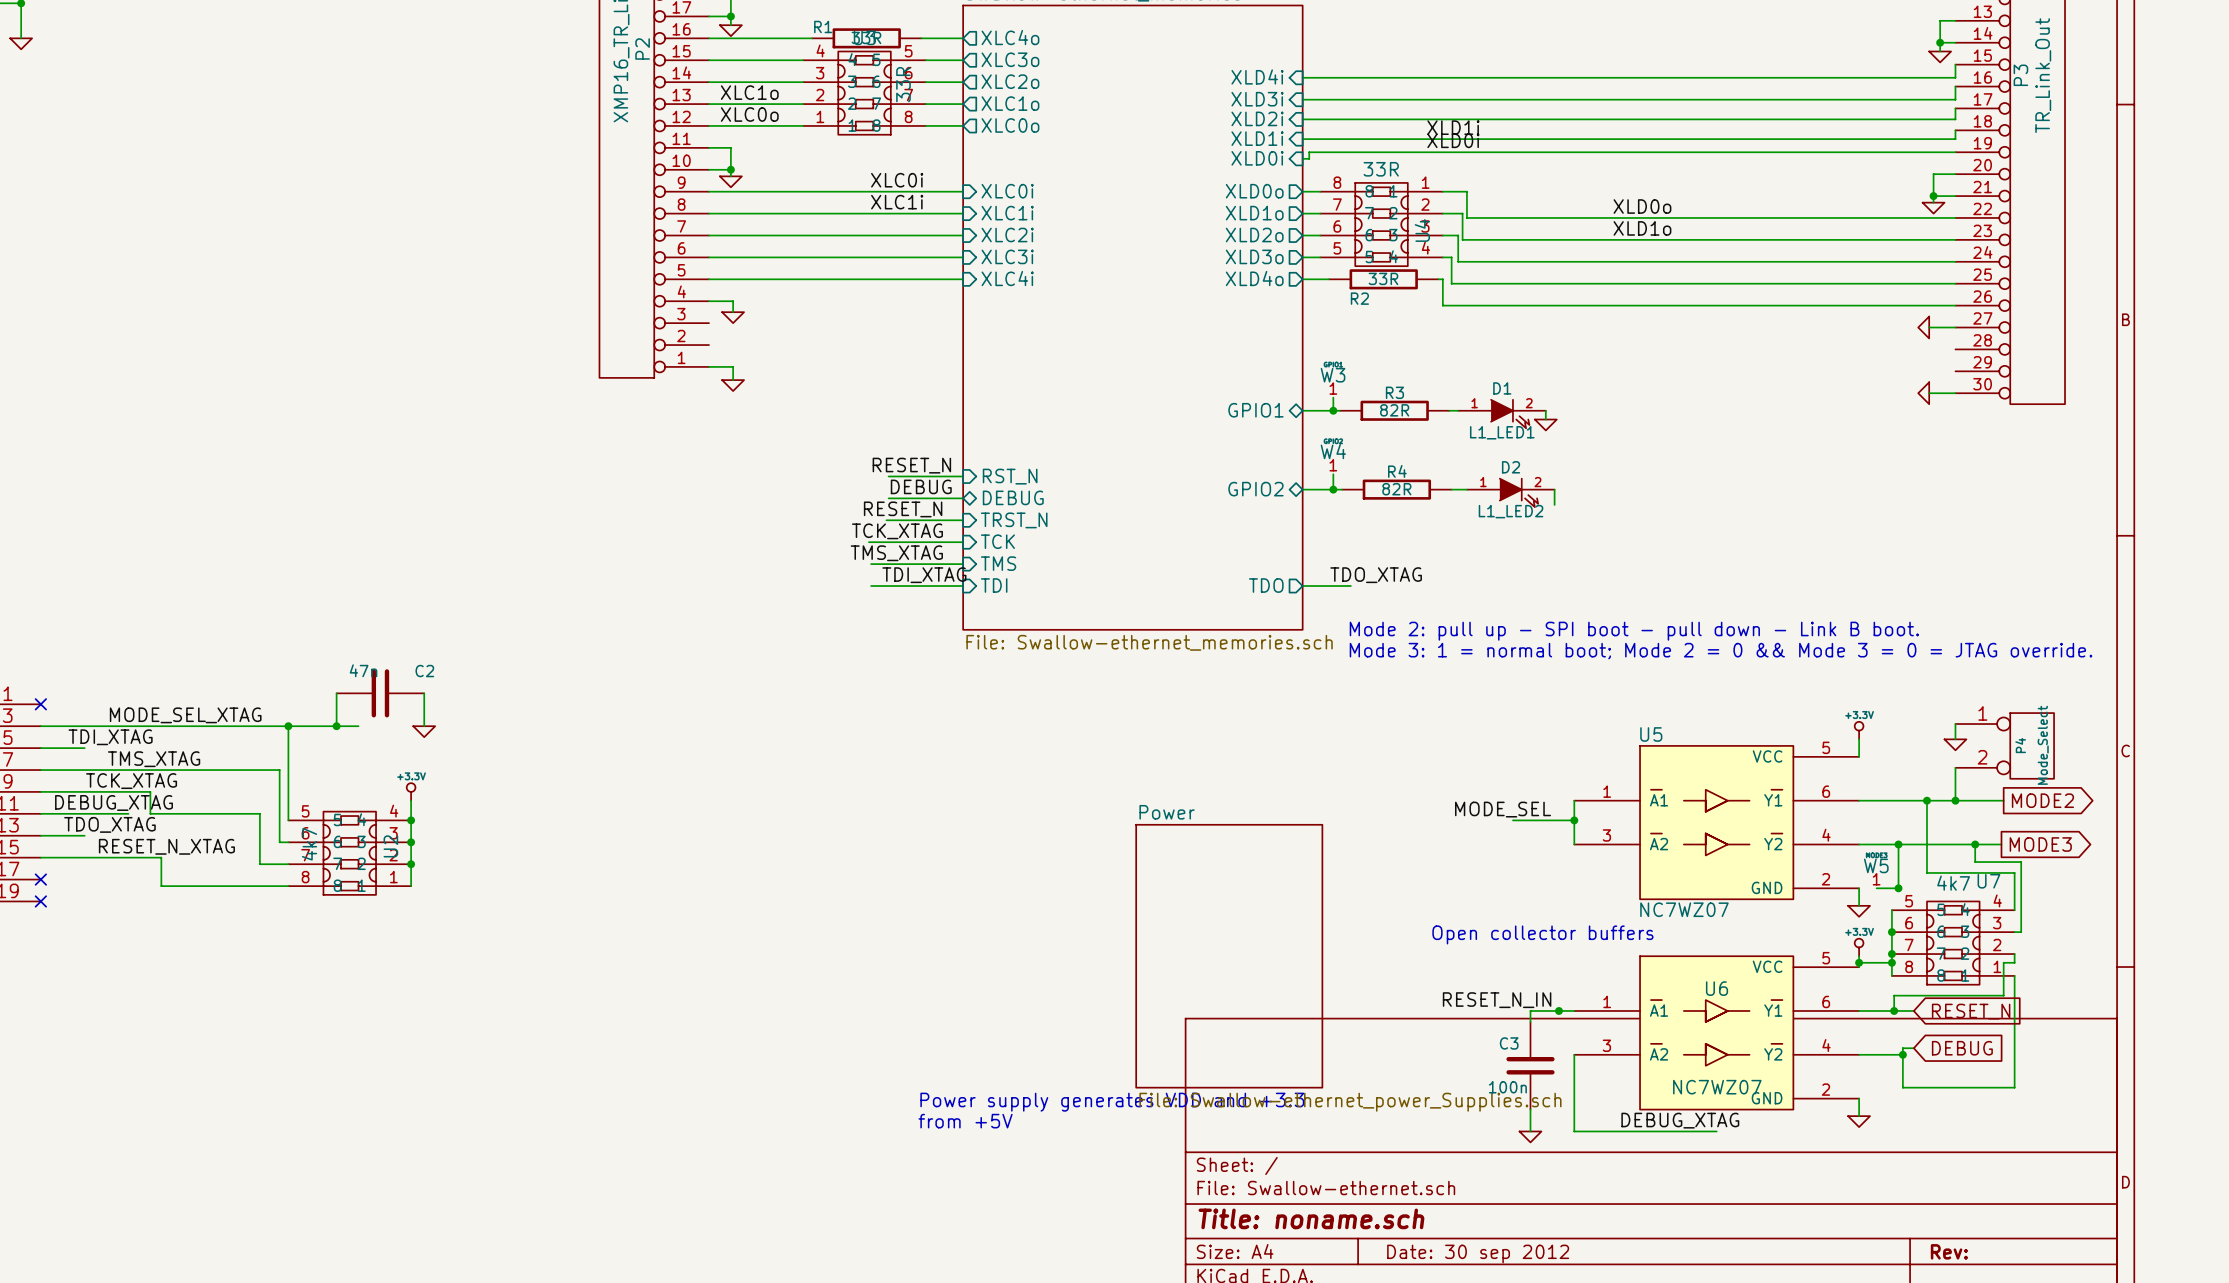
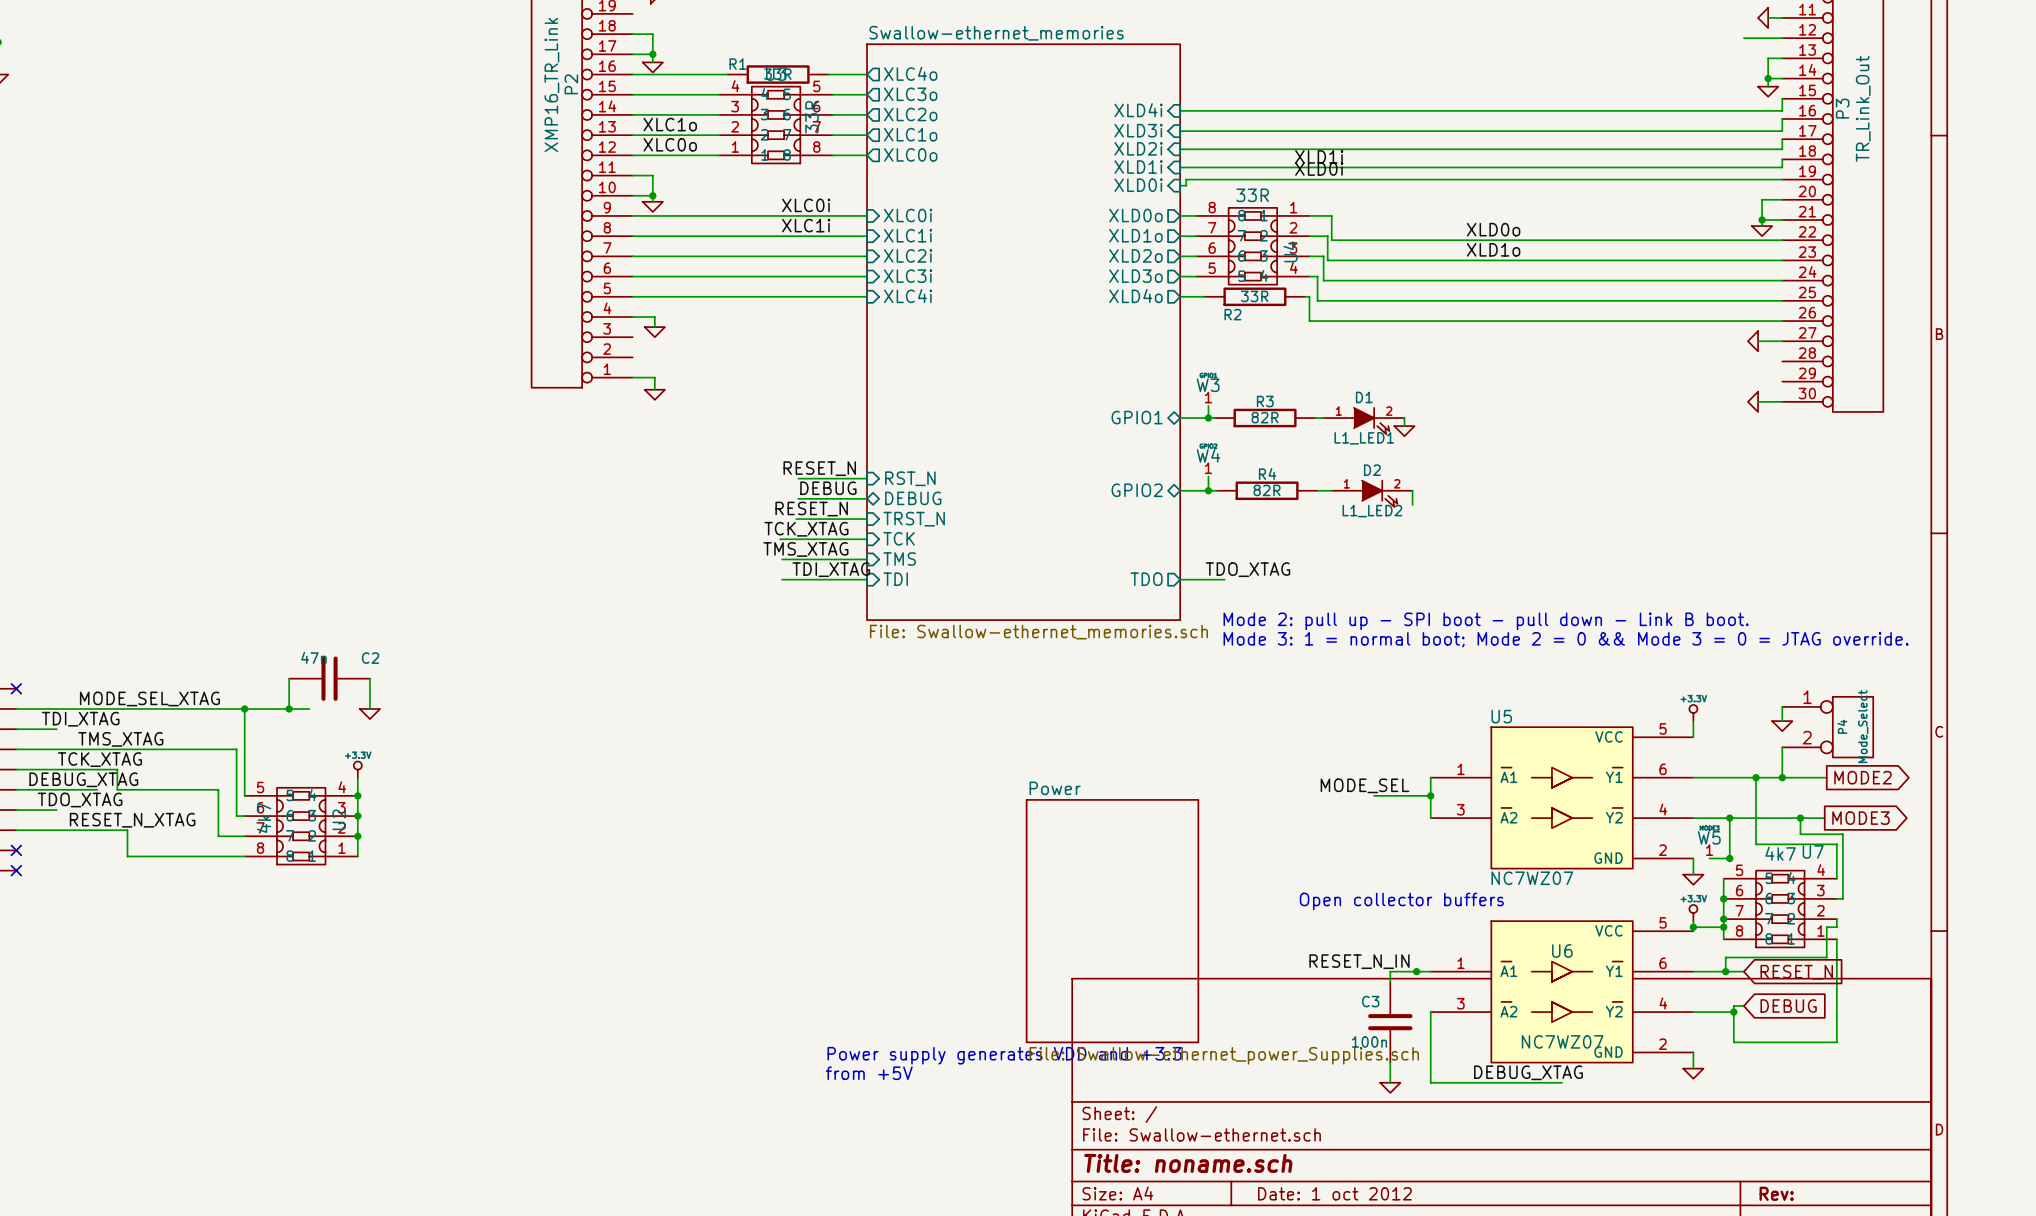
title block: Date: 30 sep 2012 (1478, 1253) -> Date: 1 oct 2012 (1334, 1193)

